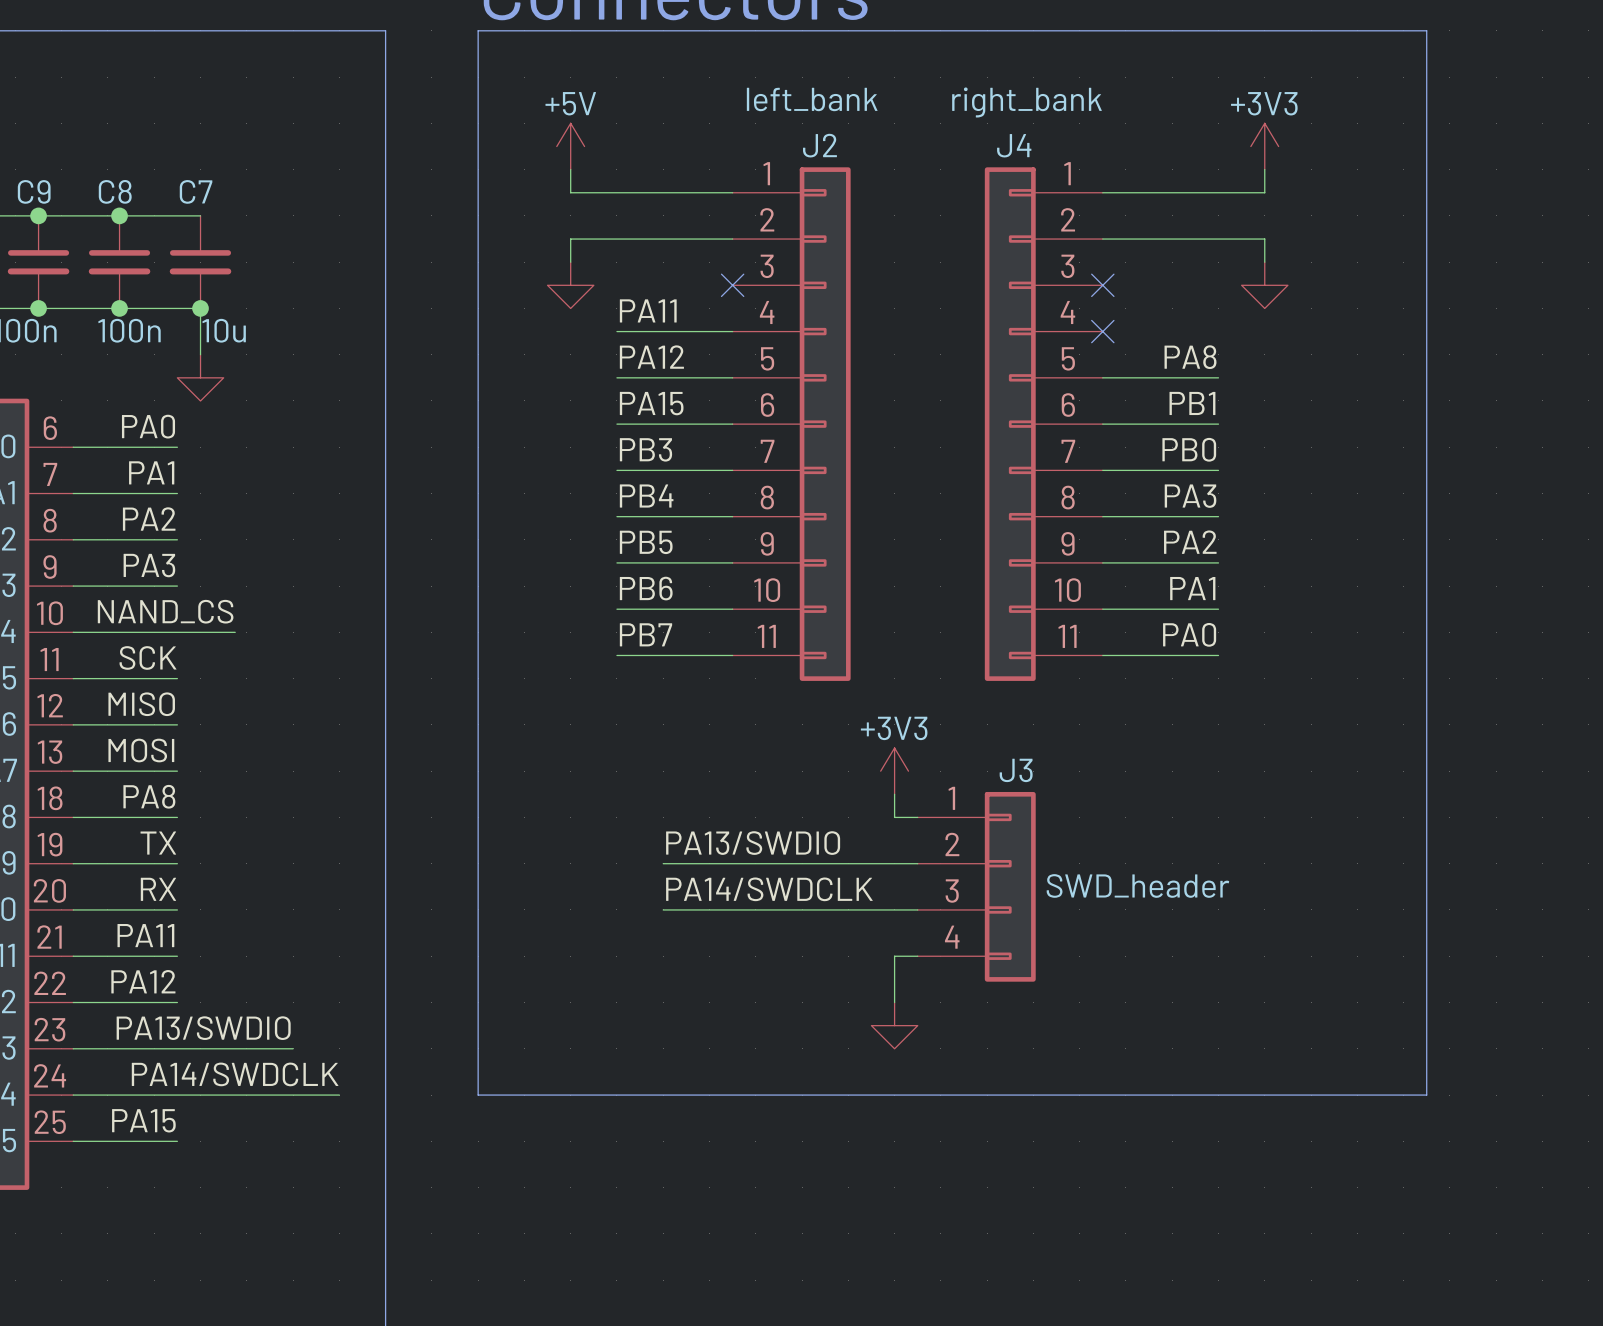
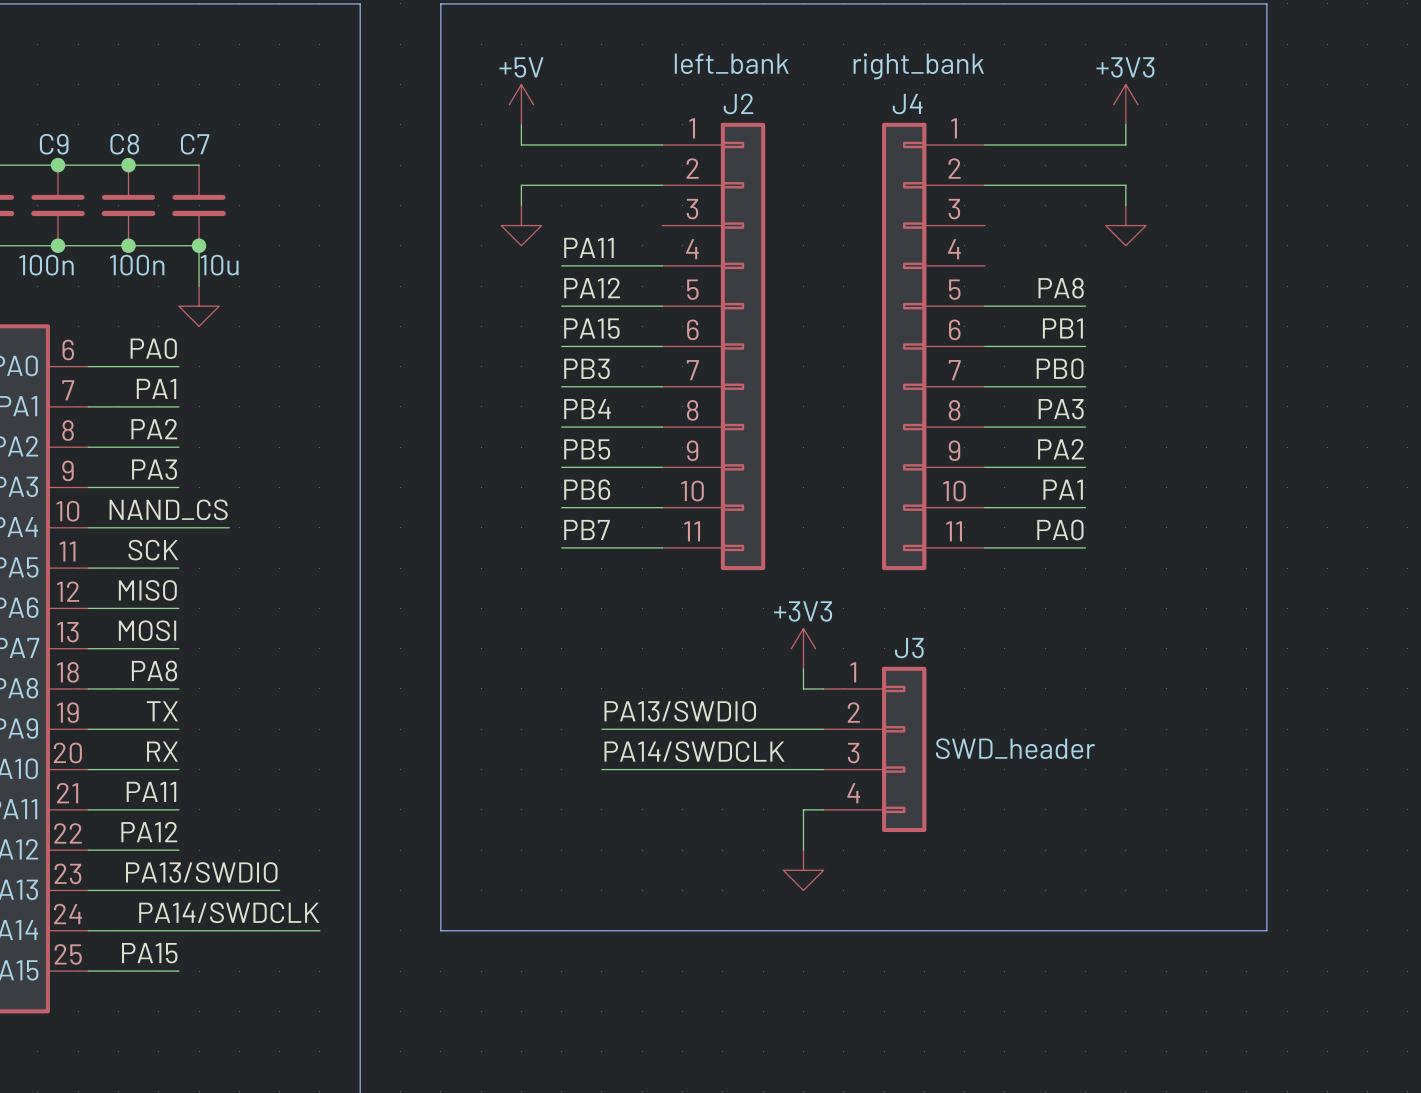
no-connect mark: (732, 285) -> none
no-connect mark: (1102, 285) -> none
no-connect mark: (1102, 331) -> none

